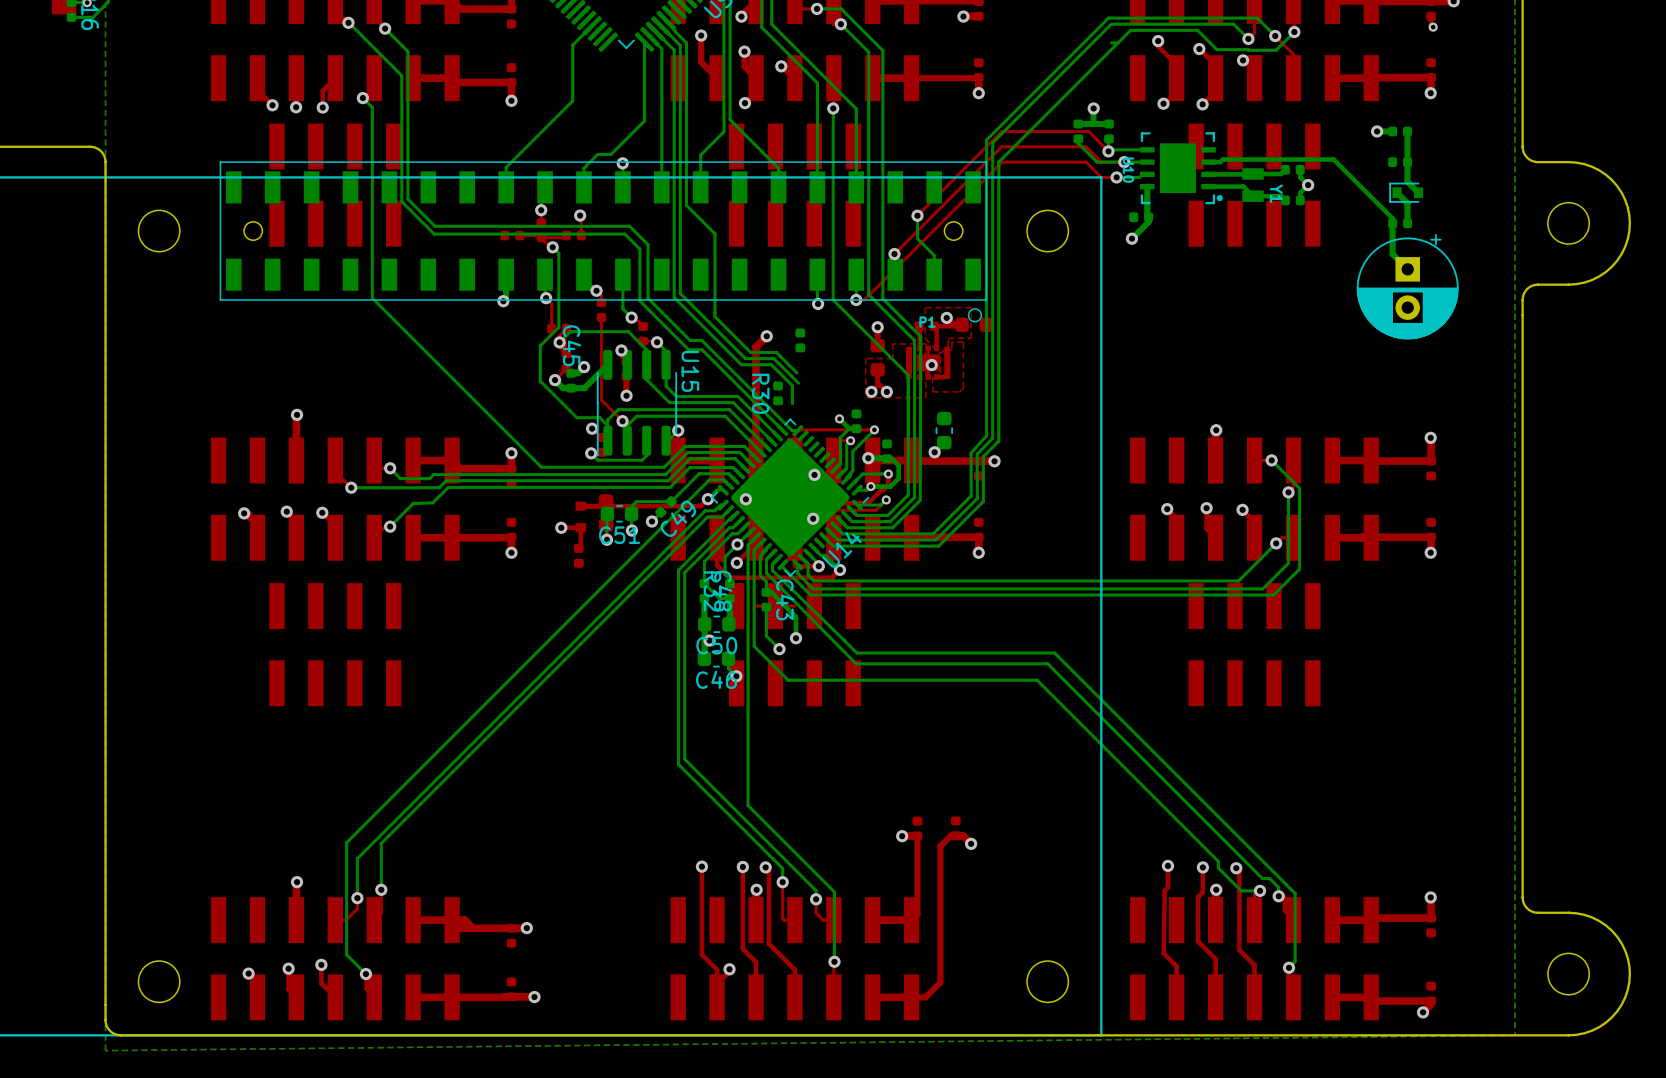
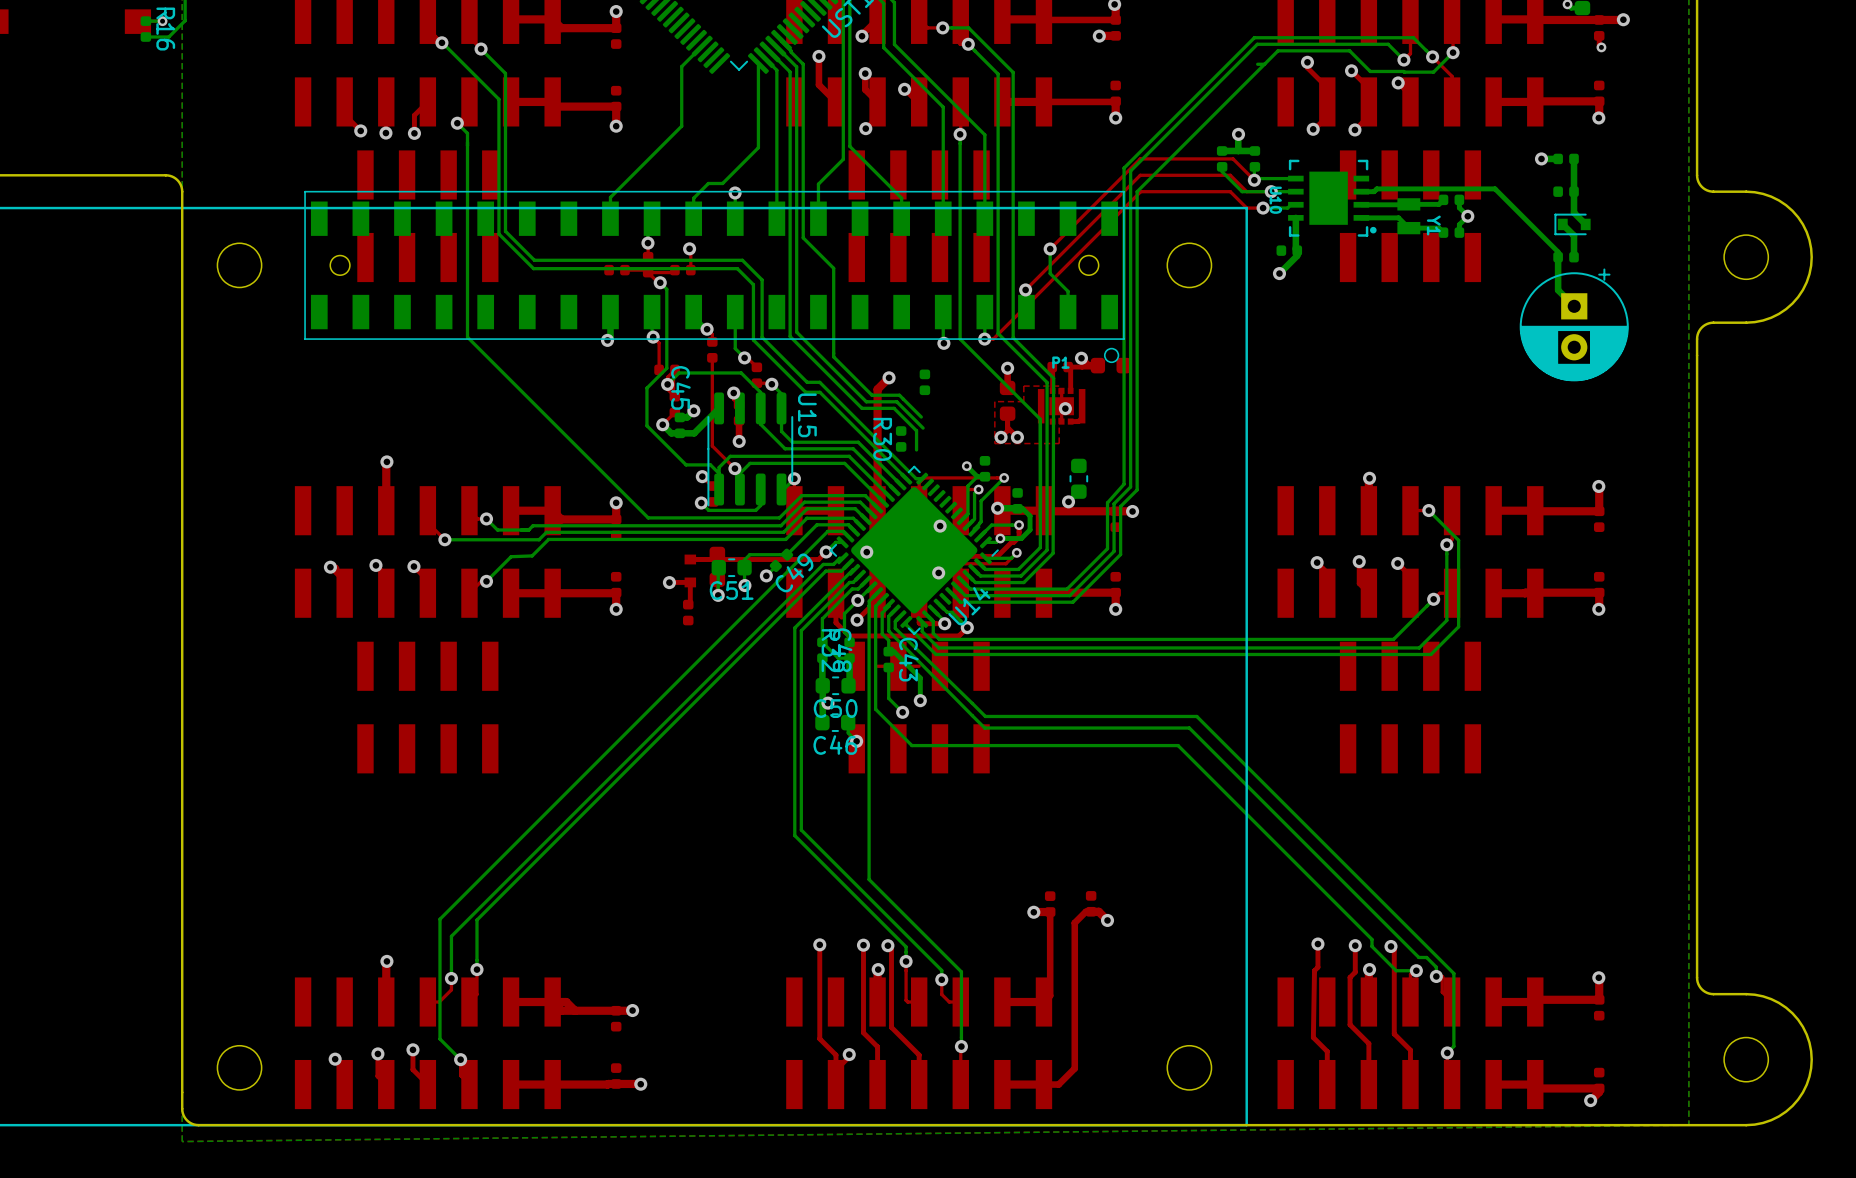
top zone outline: (971, 307) (971, 338) (948, 338) (948, 345) (940, 353) (925, 338) (925, 307) (971, 307) -> none
top zone outline: (963, 342) (963, 388) (959, 391) (932, 391) (932, 376) (940, 376) (940, 357) (948, 349) (951, 349) (951, 342) (963, 342) -> none

